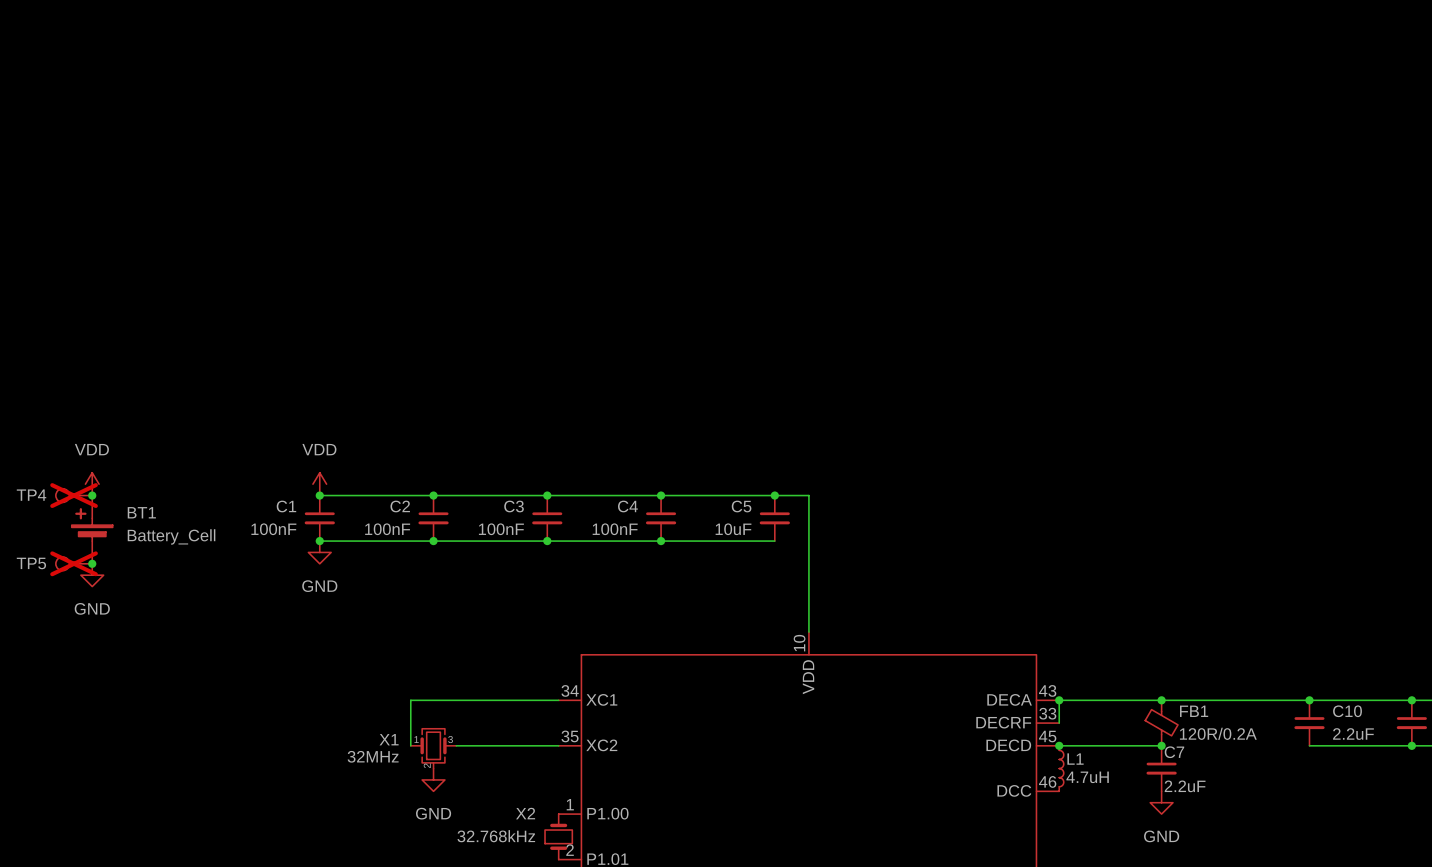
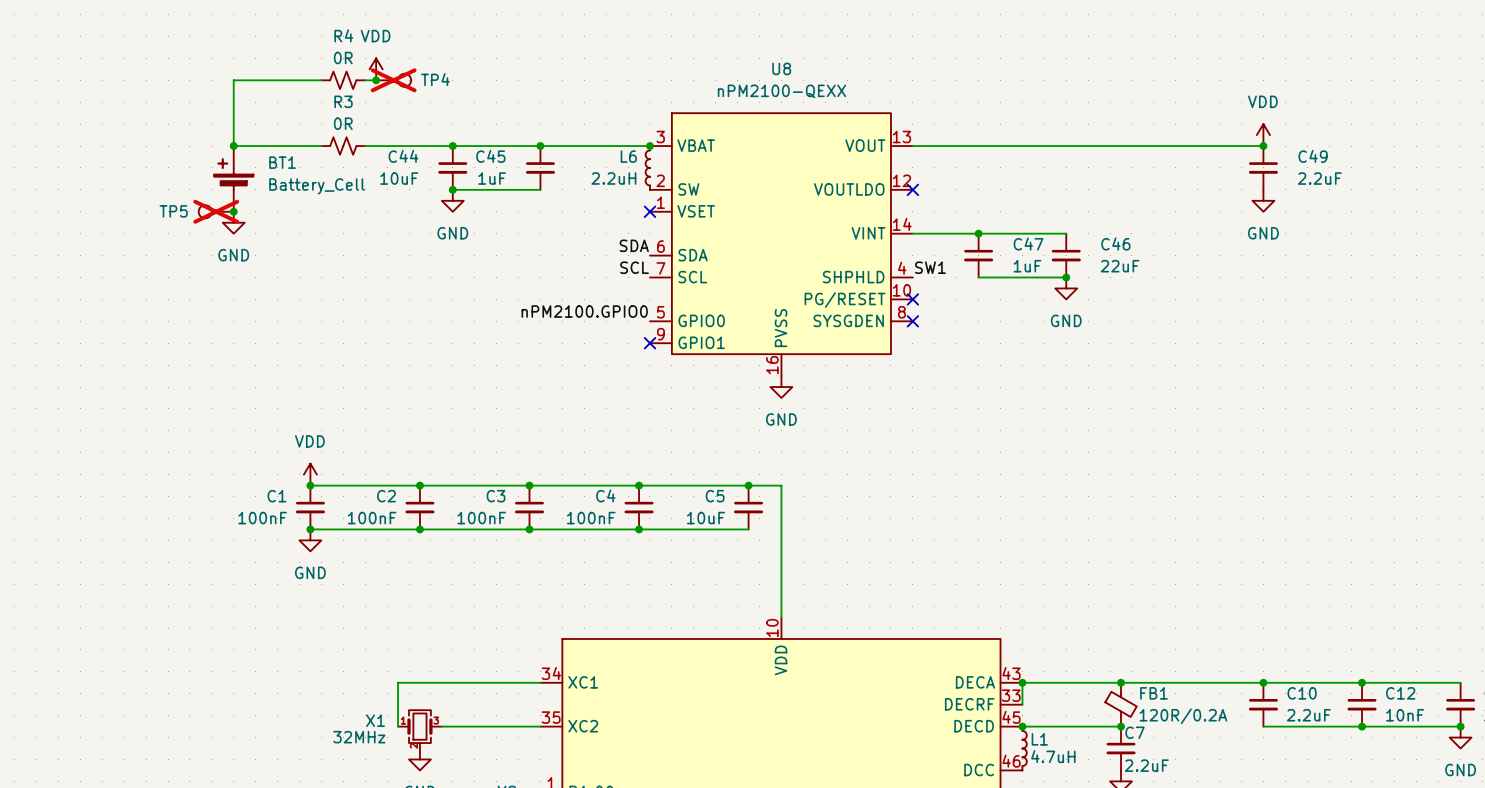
power symbol: none -> VDD (376, 69)
wire: none -> (321, 80) (233, 80) (233, 146) (321, 146)
R4: none -> 0R (343, 80)
wire: none -> (365, 80) (376, 80)
junction: none -> (376, 80)
power symbol: none -> VDD (1263, 135)
junction: none -> (233, 146)
R3: none -> 0R (343, 146)
wire: none -> (365, 146) (649, 146)
junction: none -> (452, 146)
junction: none -> (540, 146)
junction: none -> (649, 146)
wire: none -> (912, 146) (1263, 146)
junction: none -> (1263, 146)
C44: none -> 10uF (452, 167)
C45: none -> 1uF (540, 167)
L6: none -> 2.2uH (647, 167)
C49: none -> 2.2uF (1263, 167)
wire: none -> (452, 189) (540, 189)
junction: none -> (452, 189)
no-connect mark: none -> (912, 189)
power symbol: none -> GND (452, 200)
power symbol: none -> GND (1263, 200)
junction: none -> (233, 211)
no-connect mark: none -> (649, 211)
power symbol: none -> GND (233, 222)
wire: none -> (912, 233) (1066, 233)
junction: none -> (978, 233)
U8: none -> nPM2100-QEXX (781, 244)
label: none -> SDA (634, 245)
C47: none -> 1uF (978, 255)
C46: none -> 22uF (1066, 255)
label: none -> SCL (634, 267)
label: none -> SW1 (930, 267)
wire: none -> (978, 277) (1066, 277)
junction: none -> (1066, 277)
power symbol: none -> GND (1066, 288)
no-connect mark: none -> (912, 299)
label: none -> nPM2100.GPIO0 (584, 311)
no-connect mark: none -> (912, 321)
no-connect mark: none -> (649, 343)
power symbol: none -> GND (781, 387)
power symbol: VDD (92, 484) -> none
TP4 rotation: 0° (62, 495) -> 180° (404, 80)
TP4 position: (74, 495) -> (393, 80)
junction: (92, 495) -> none
BT1 position: (92, 529) -> (233, 178)
TP5 position: (74, 563) -> (216, 211)
junction: (92, 563) -> none
power symbol: GND (92, 575) -> none

